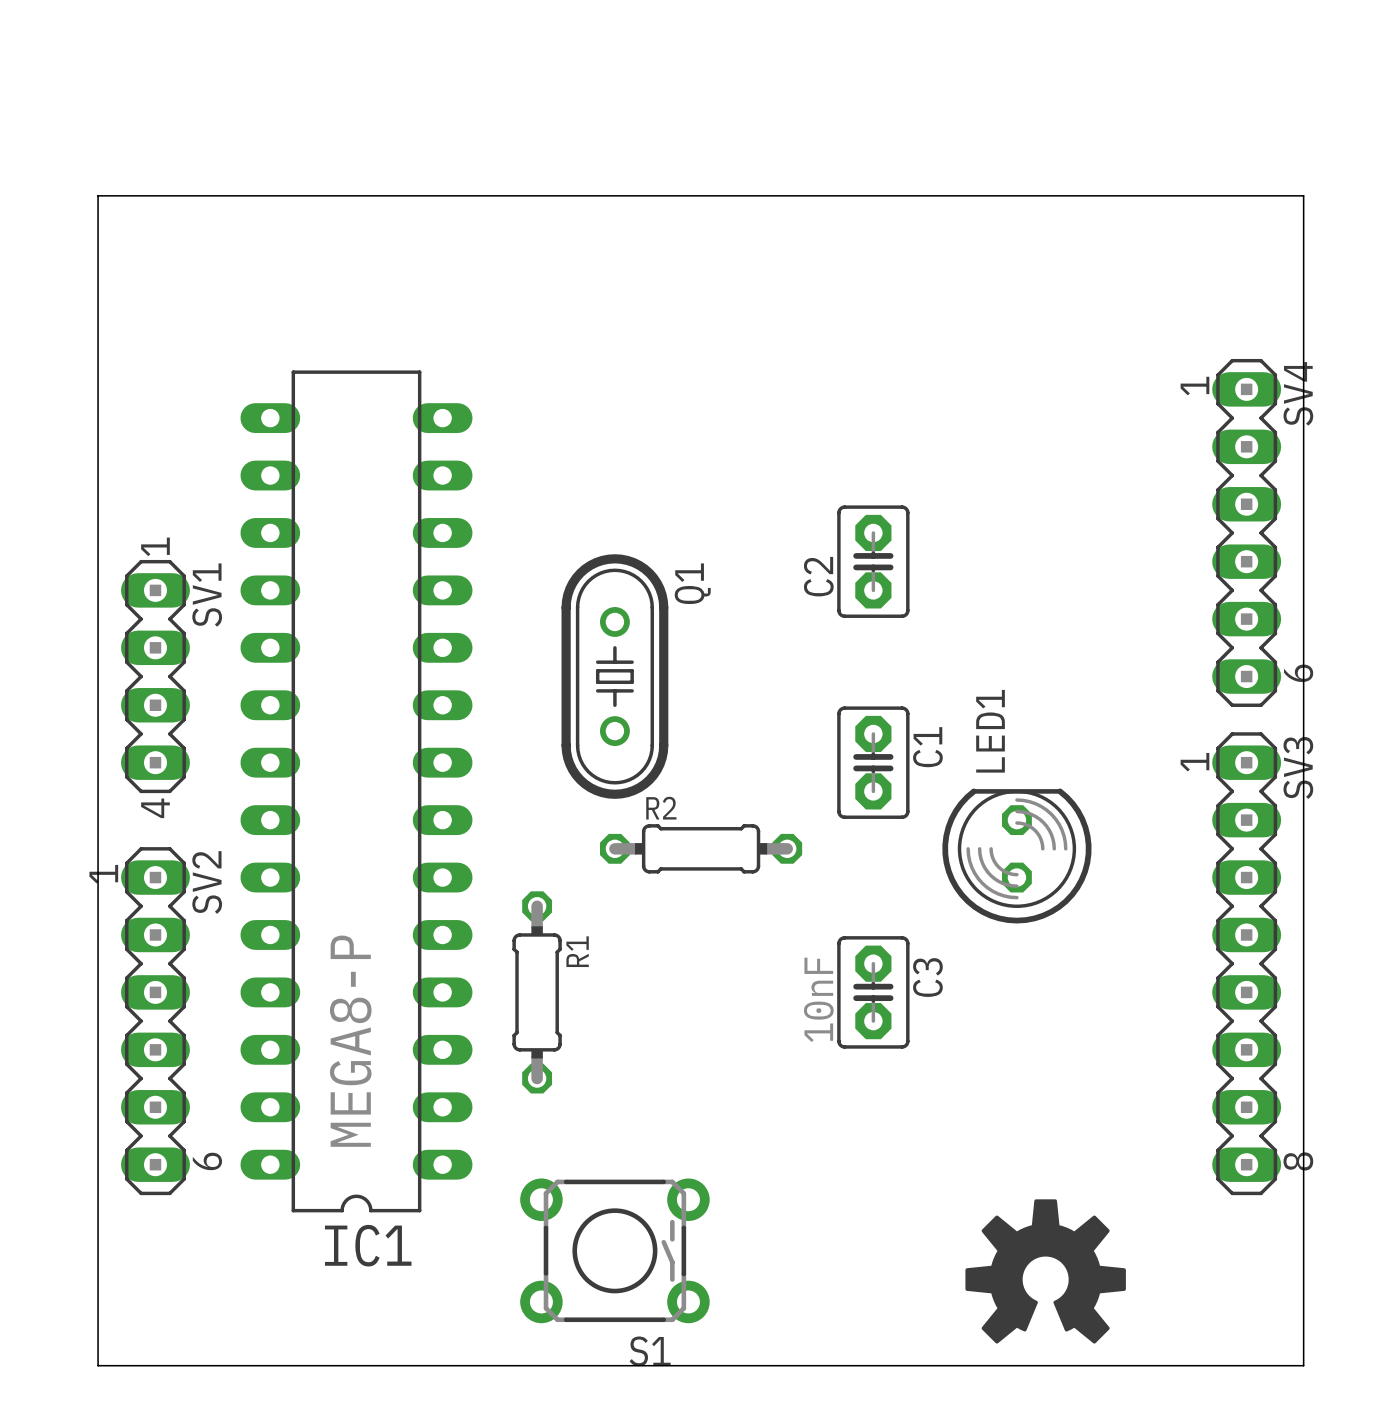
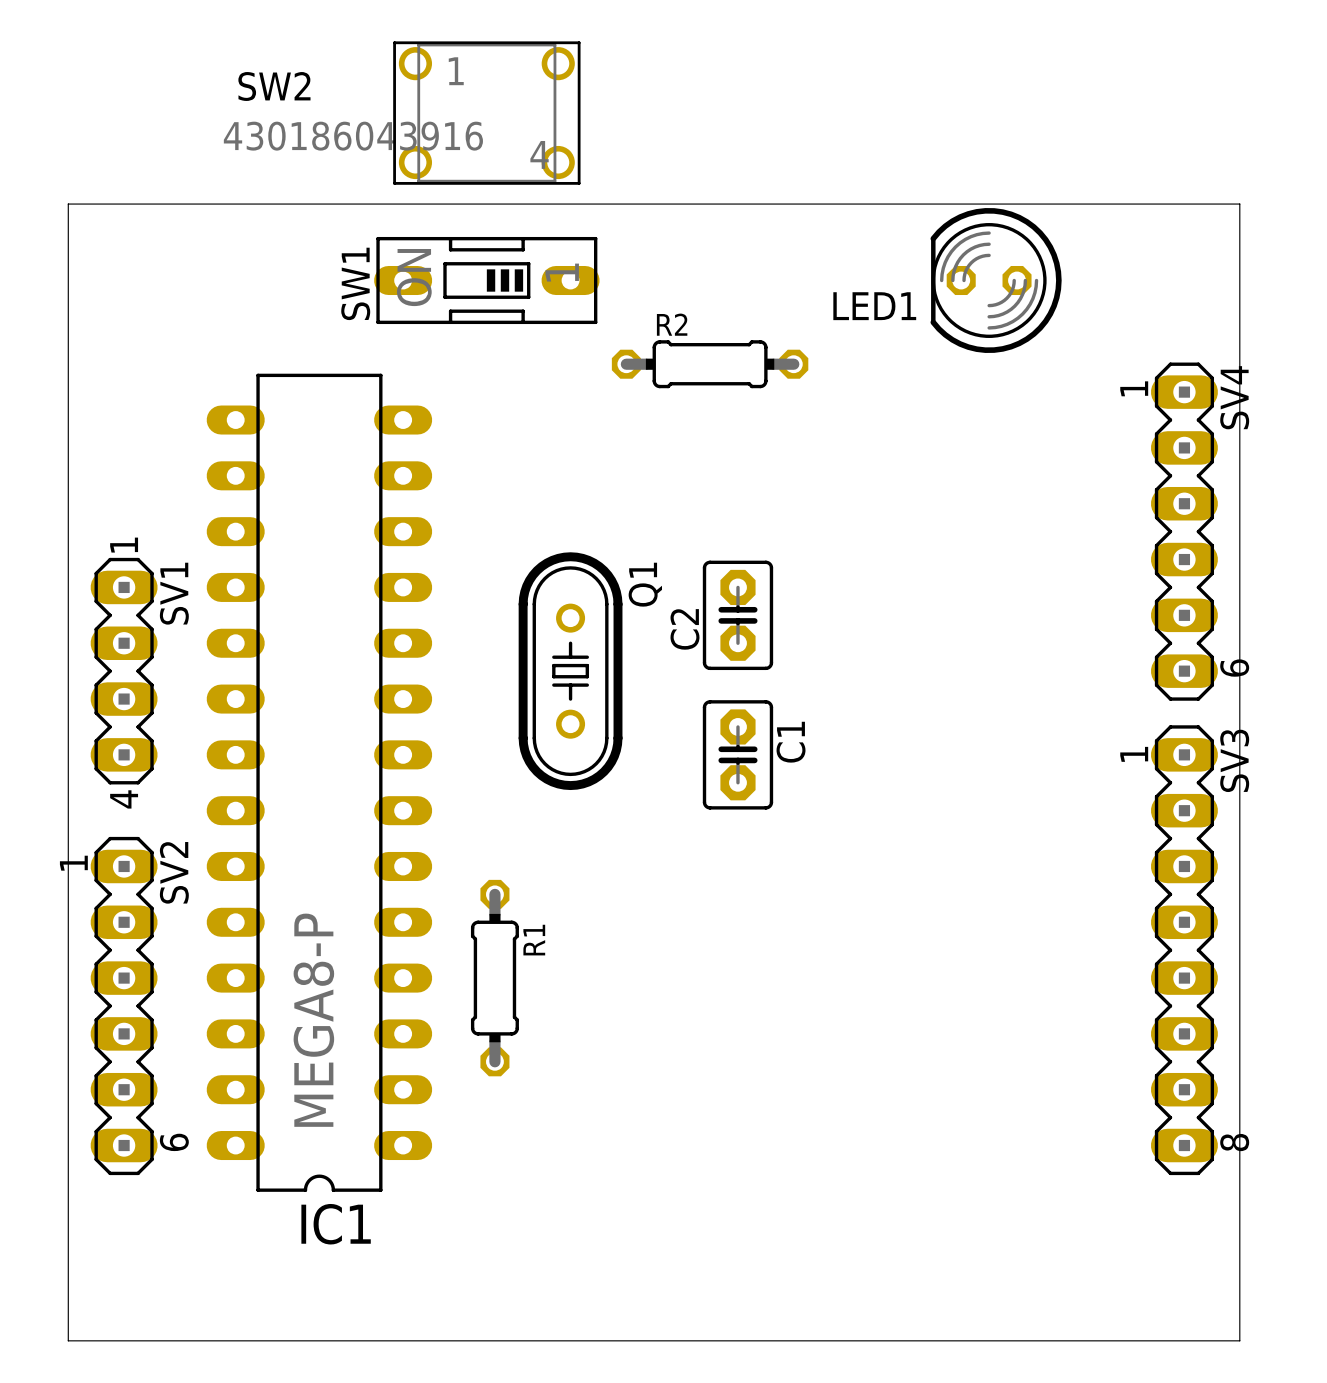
SW2: none -> 430186043916 (486, 113)
SW1: none -> (486, 280)
C2 position: (873, 561) -> (737, 615)
C1 position: (873, 762) -> (737, 754)
R2 position: (701, 848) -> (710, 364)
LED1 rotation: 0° (1016, 856) -> 90° counterclockwise (996, 280)
LED1 position: (1016, 856) -> (996, 280)
C3: 10nF (873, 992) -> none
drawing: [965, 1199, 1126, 1344] -> none
S1: (614, 1250) -> none

